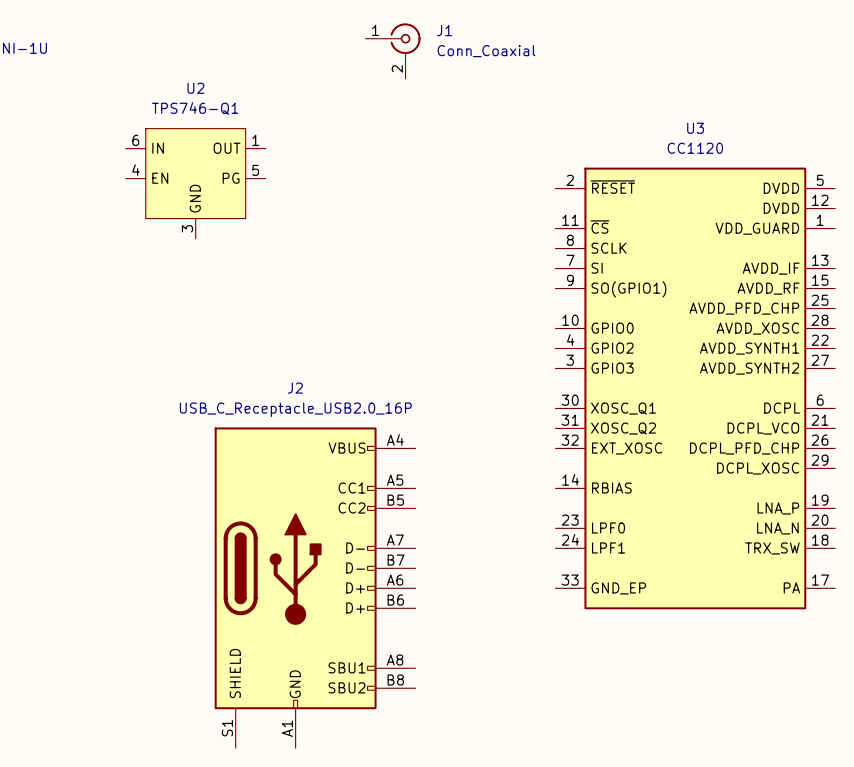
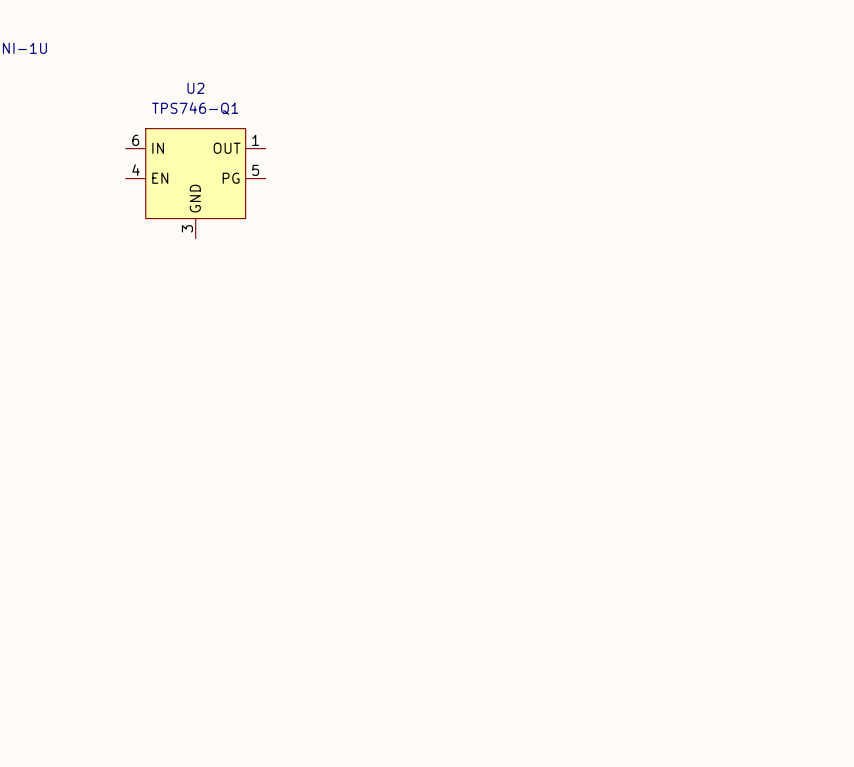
J1: Conn_Coaxial (393, 51) -> none
U3: CC1120 (695, 388) -> none
J2: USB_C_Receptacle_USB2.0_16P (315, 587) -> none

